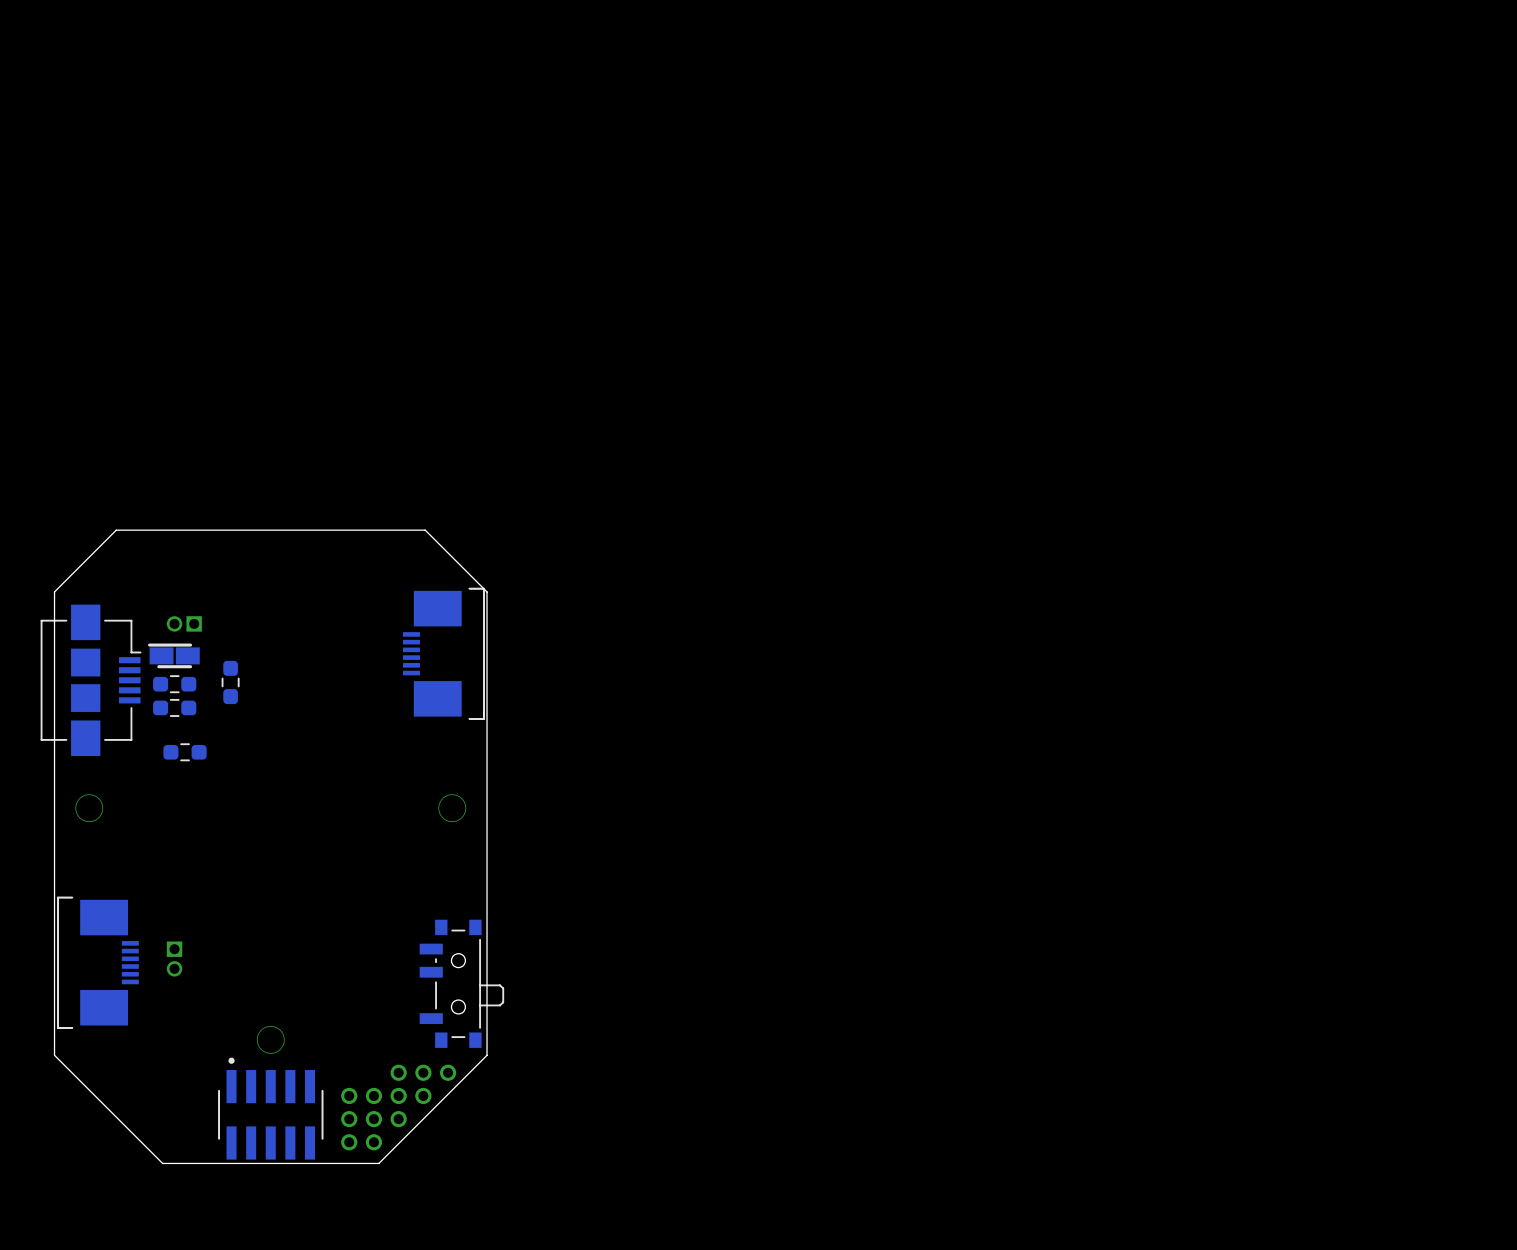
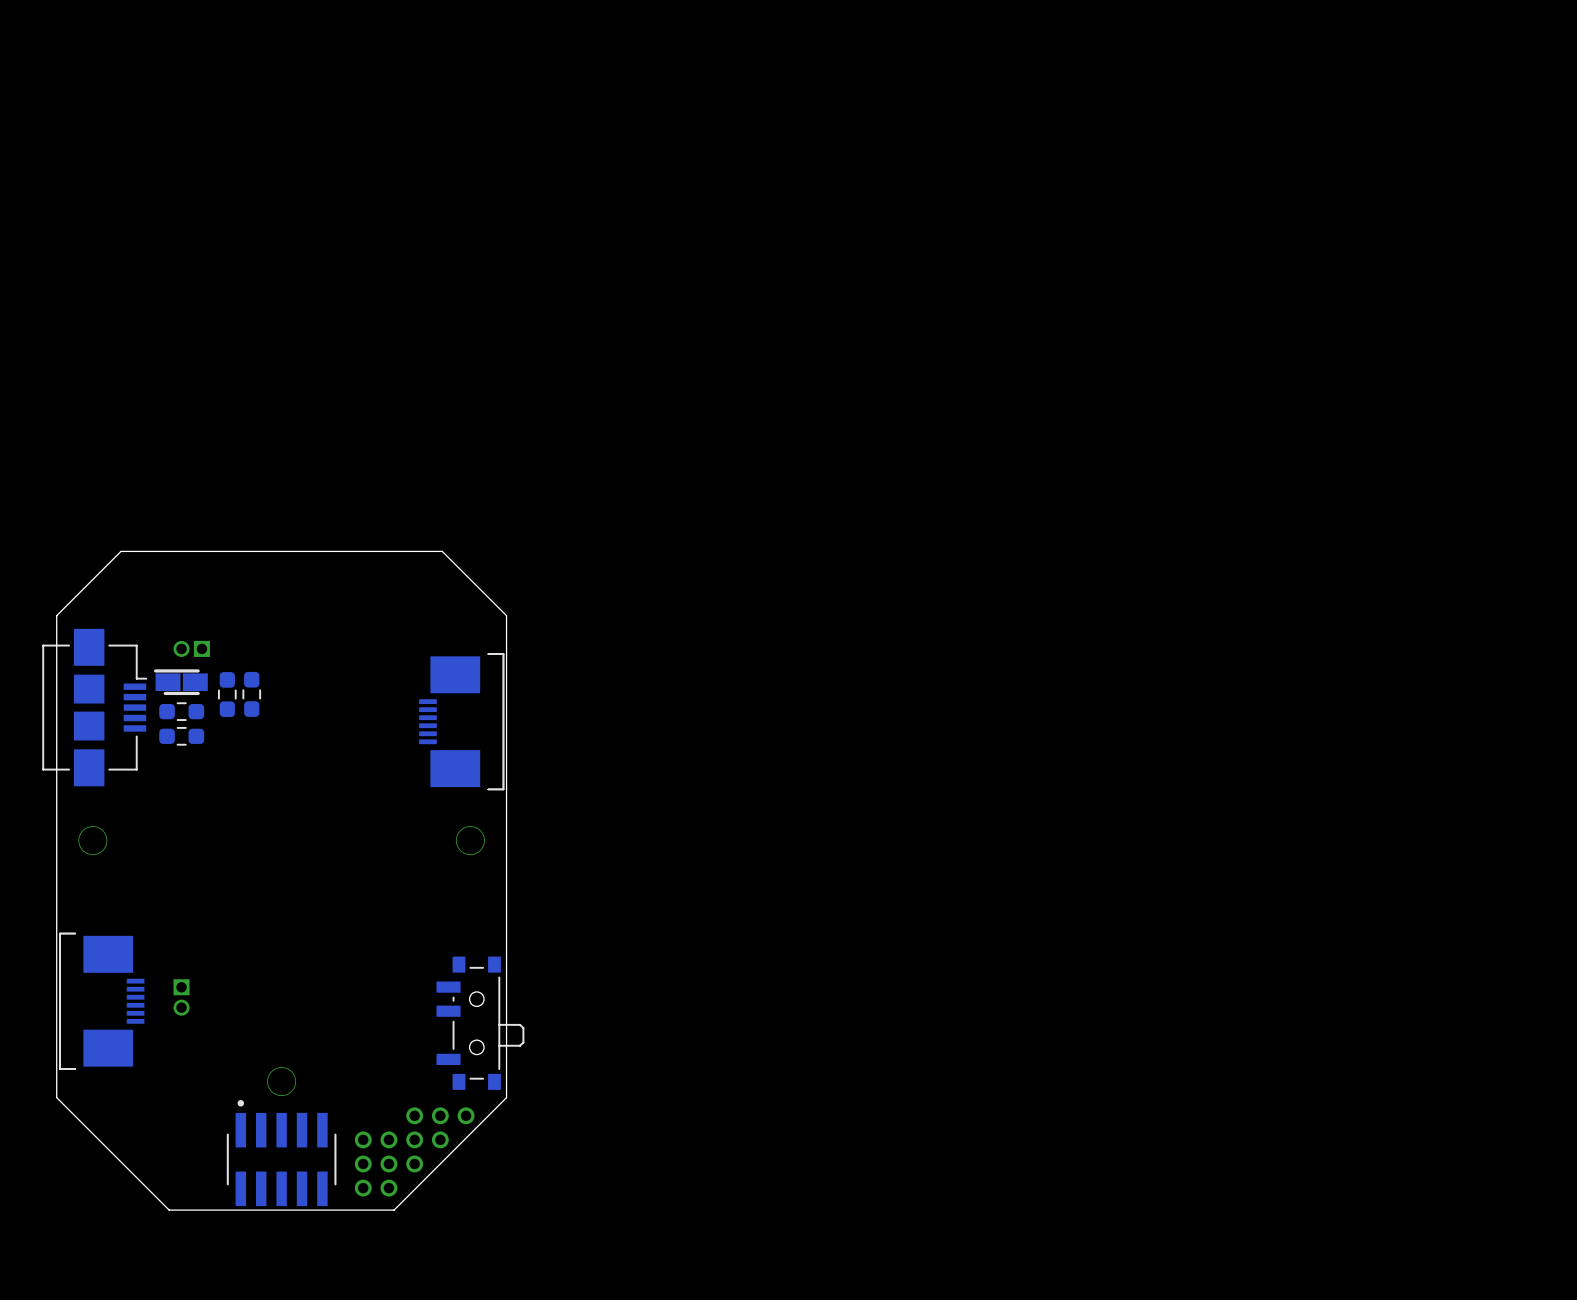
part position: (443, 653) -> (461, 721)
part: none -> (227, 694)
part: none -> (251, 694)
part: (230, 682) -> none
part: (185, 752) -> none

